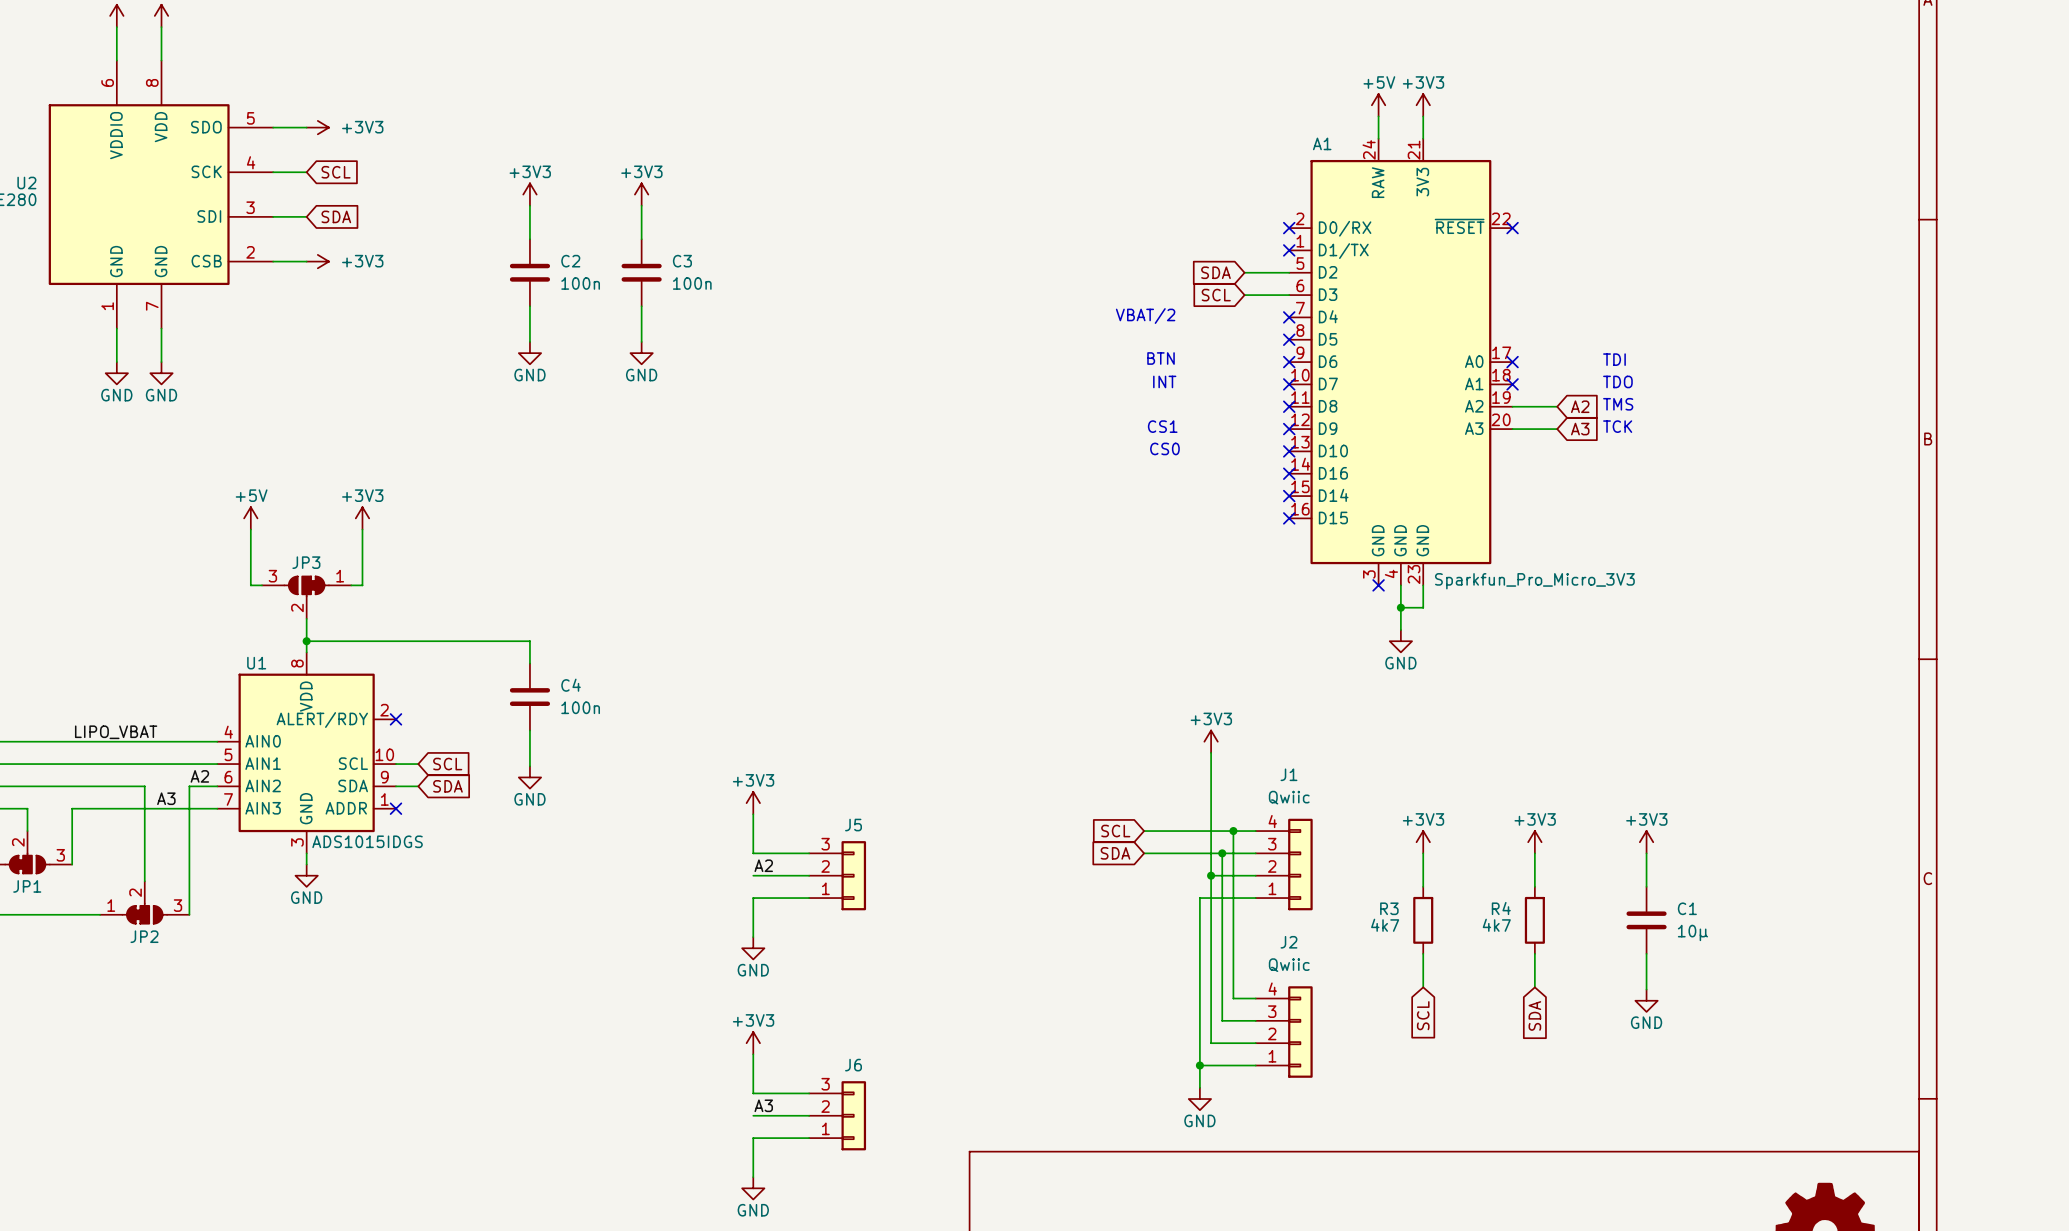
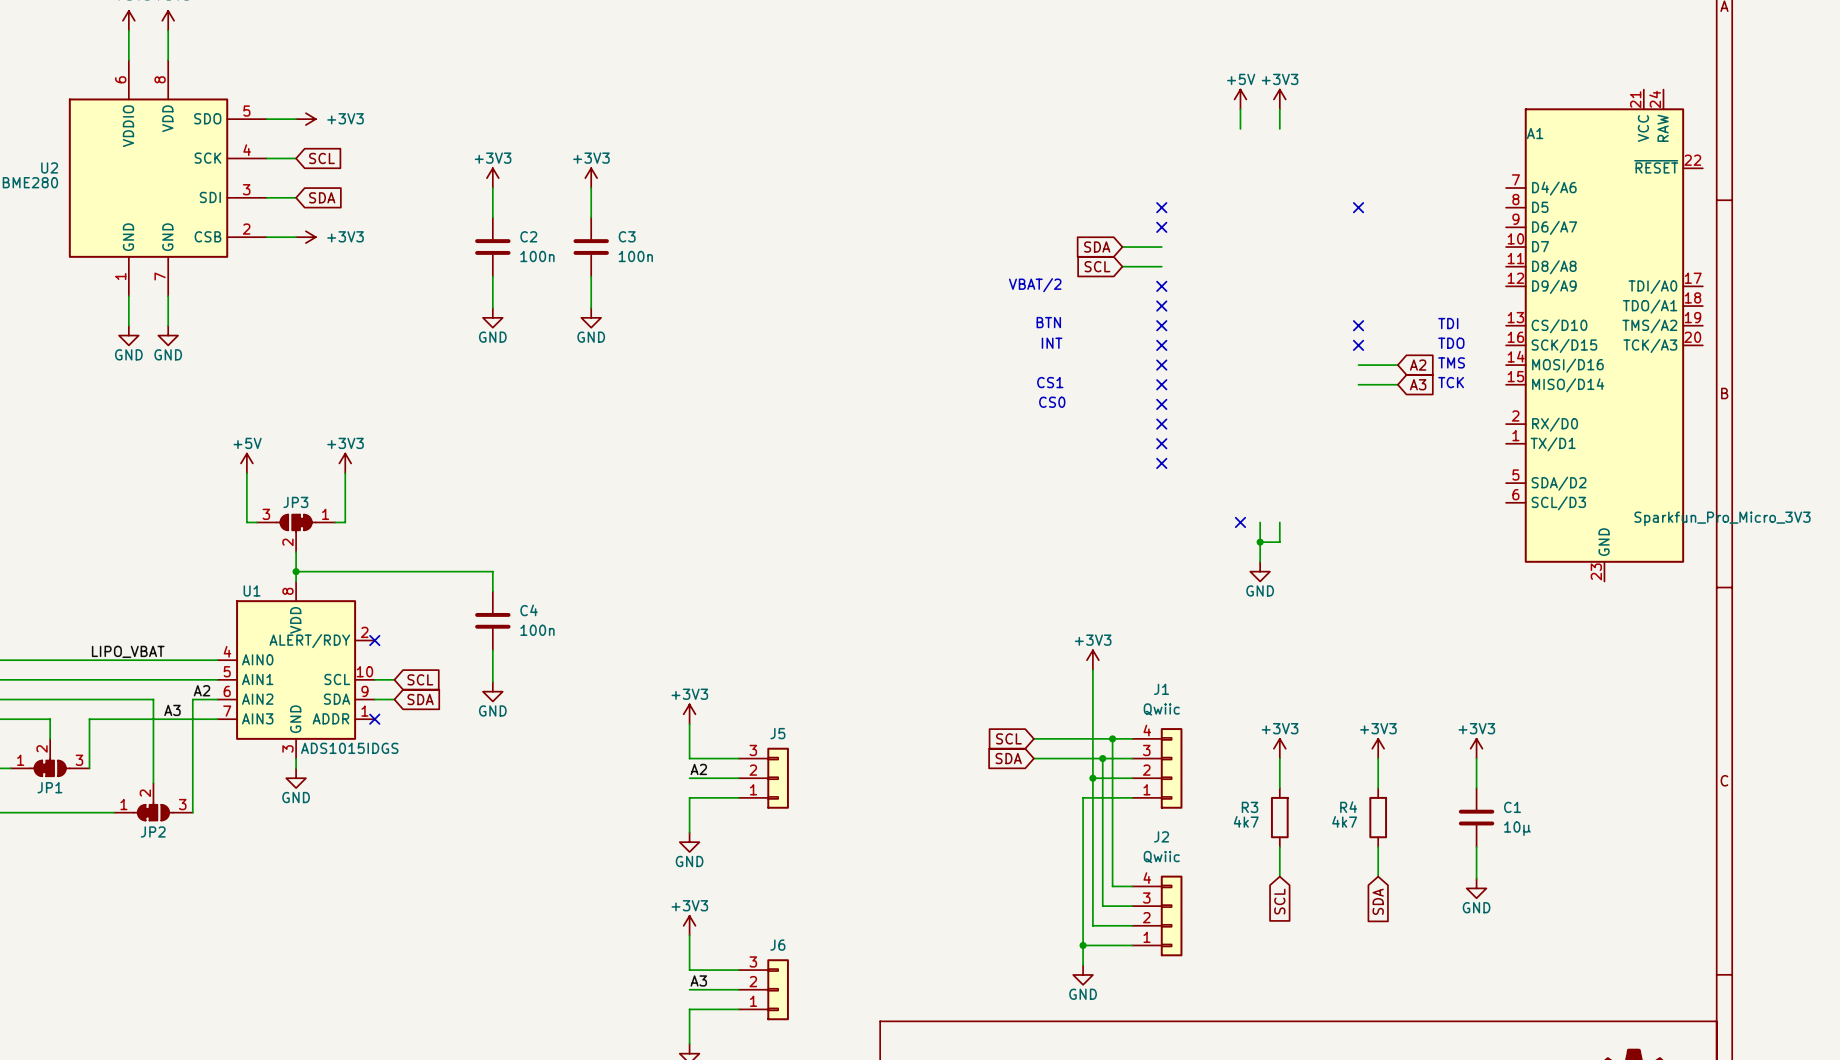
A1 symbol: [1289, 138, 1513, 586] -> [1506, 89, 1703, 582]

